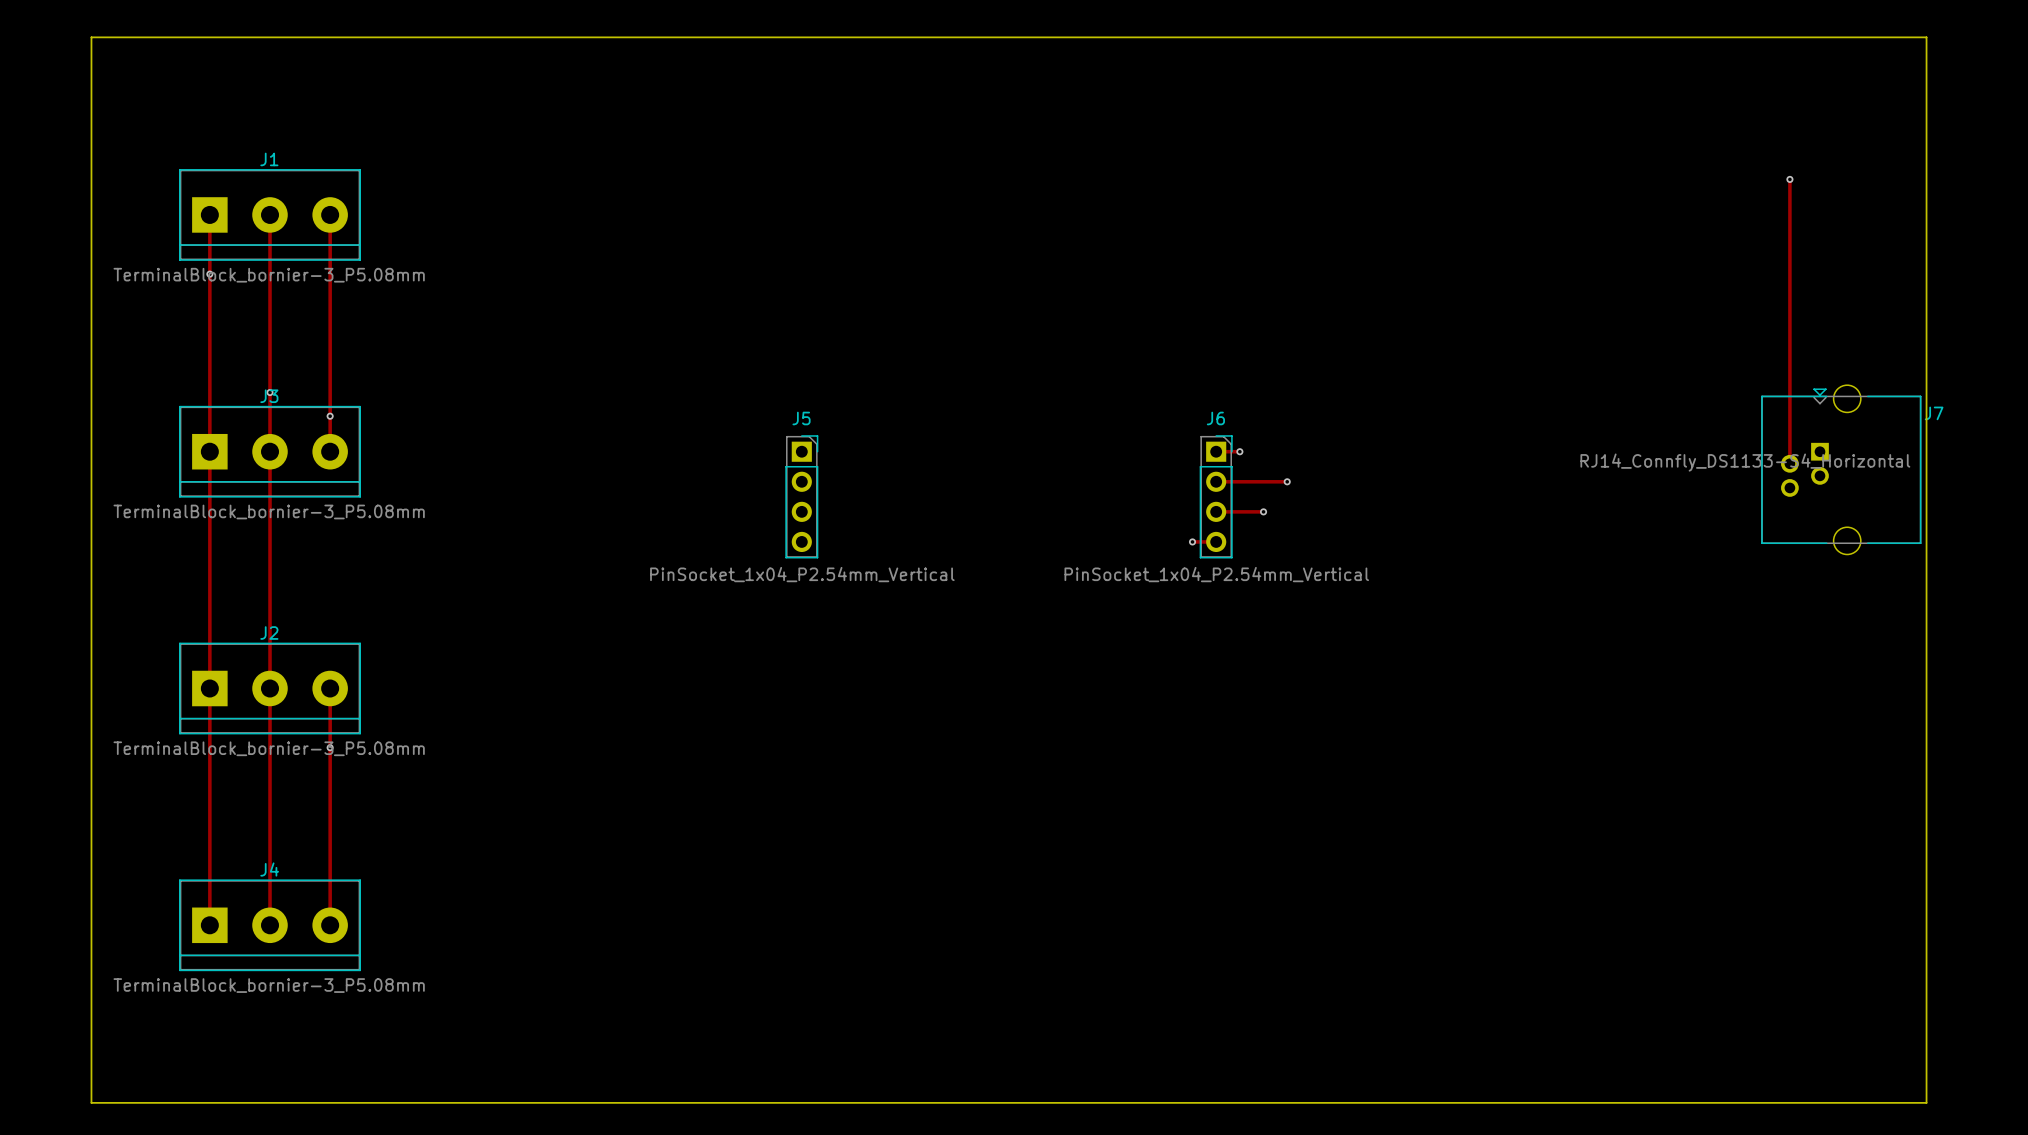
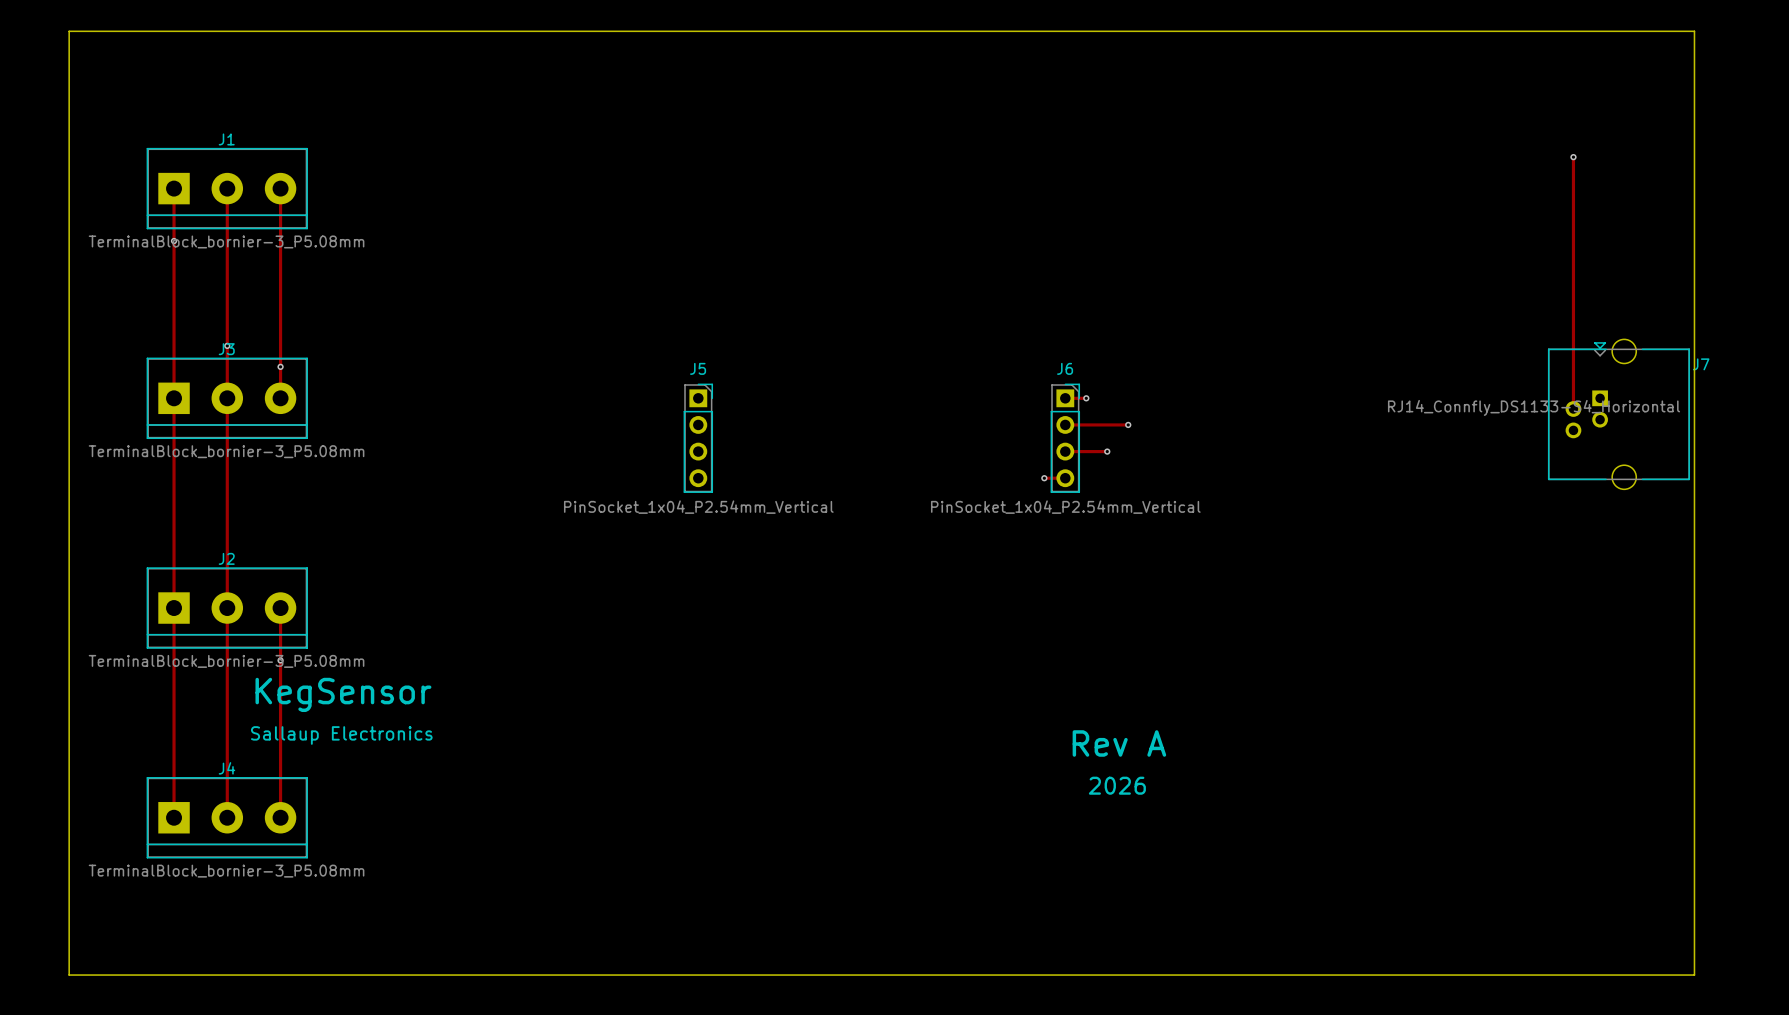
text: none -> KegSensor (343, 694)
text: none -> Sallaup Electronics (341, 735)
text: none -> Rev A (1119, 743)
text: none -> 2026 (1117, 785)

